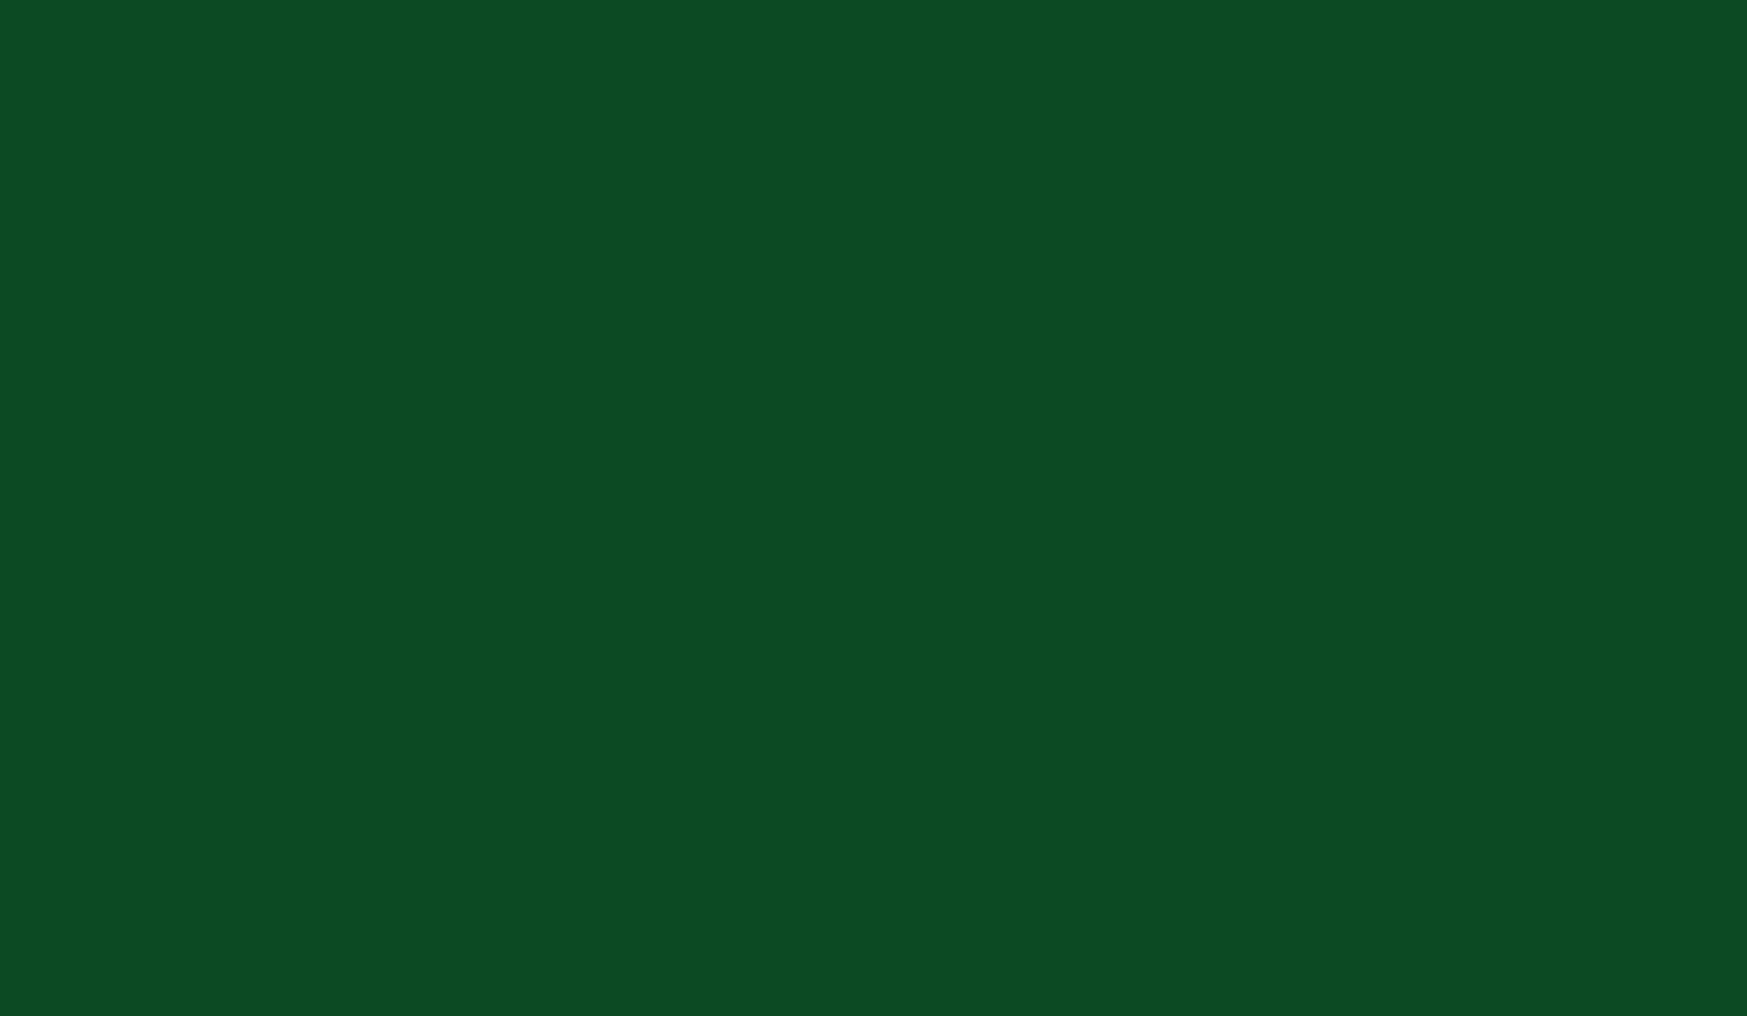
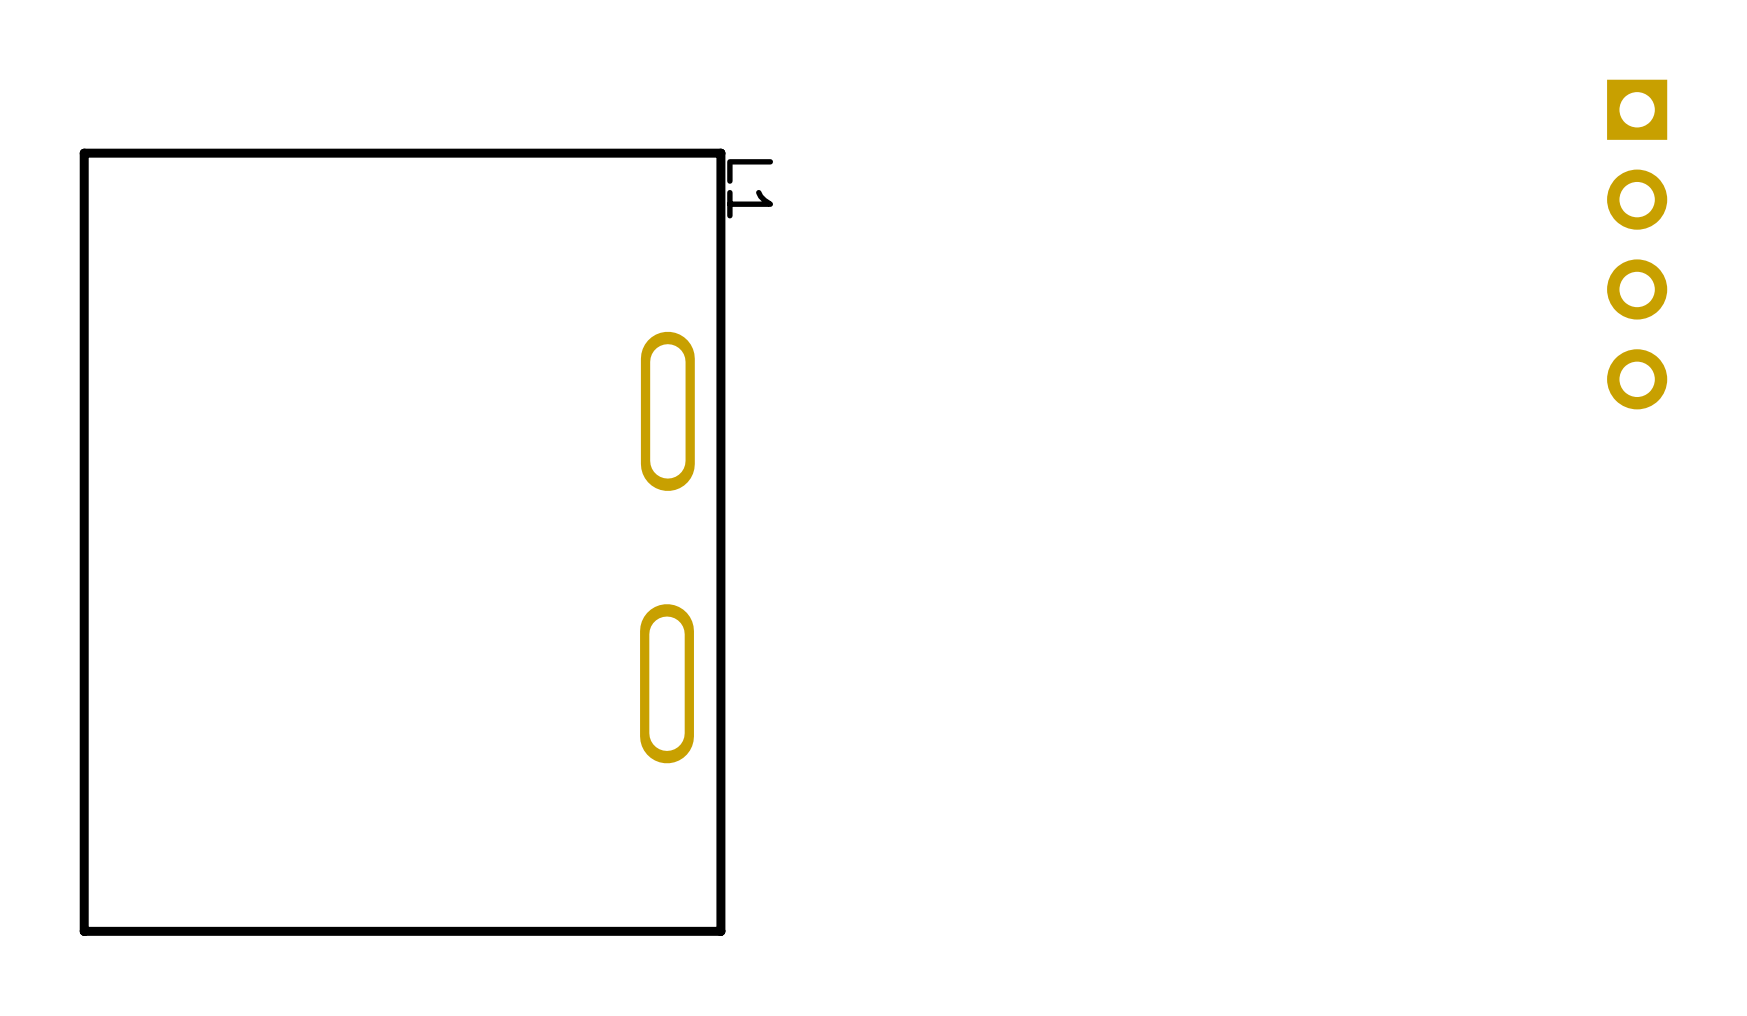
part: none -> (1637, 244)
L1: none -> (402, 542)

